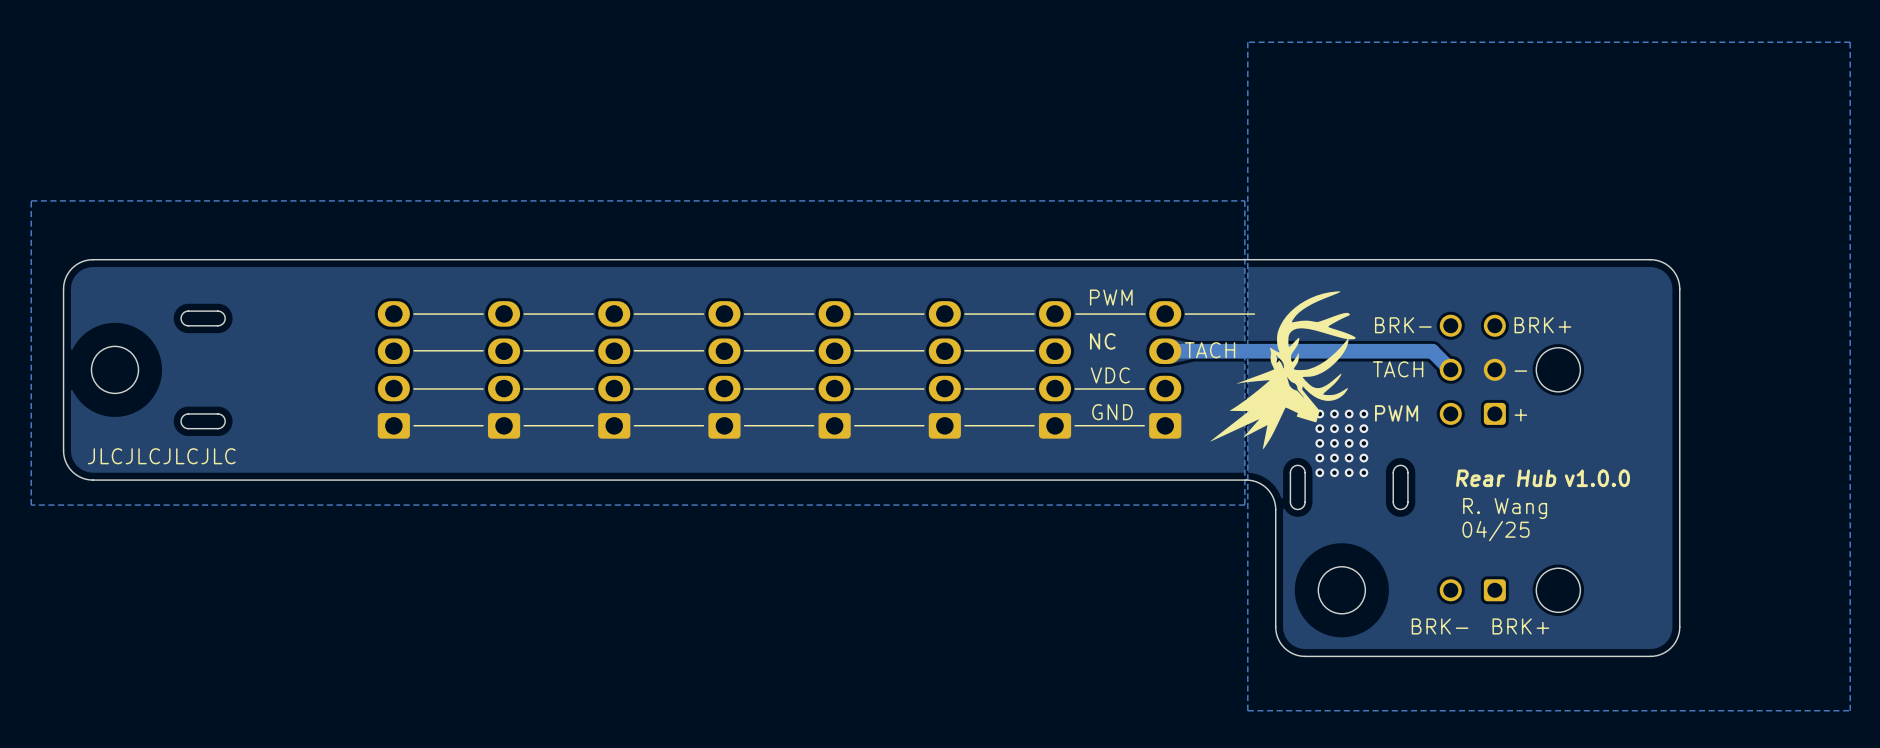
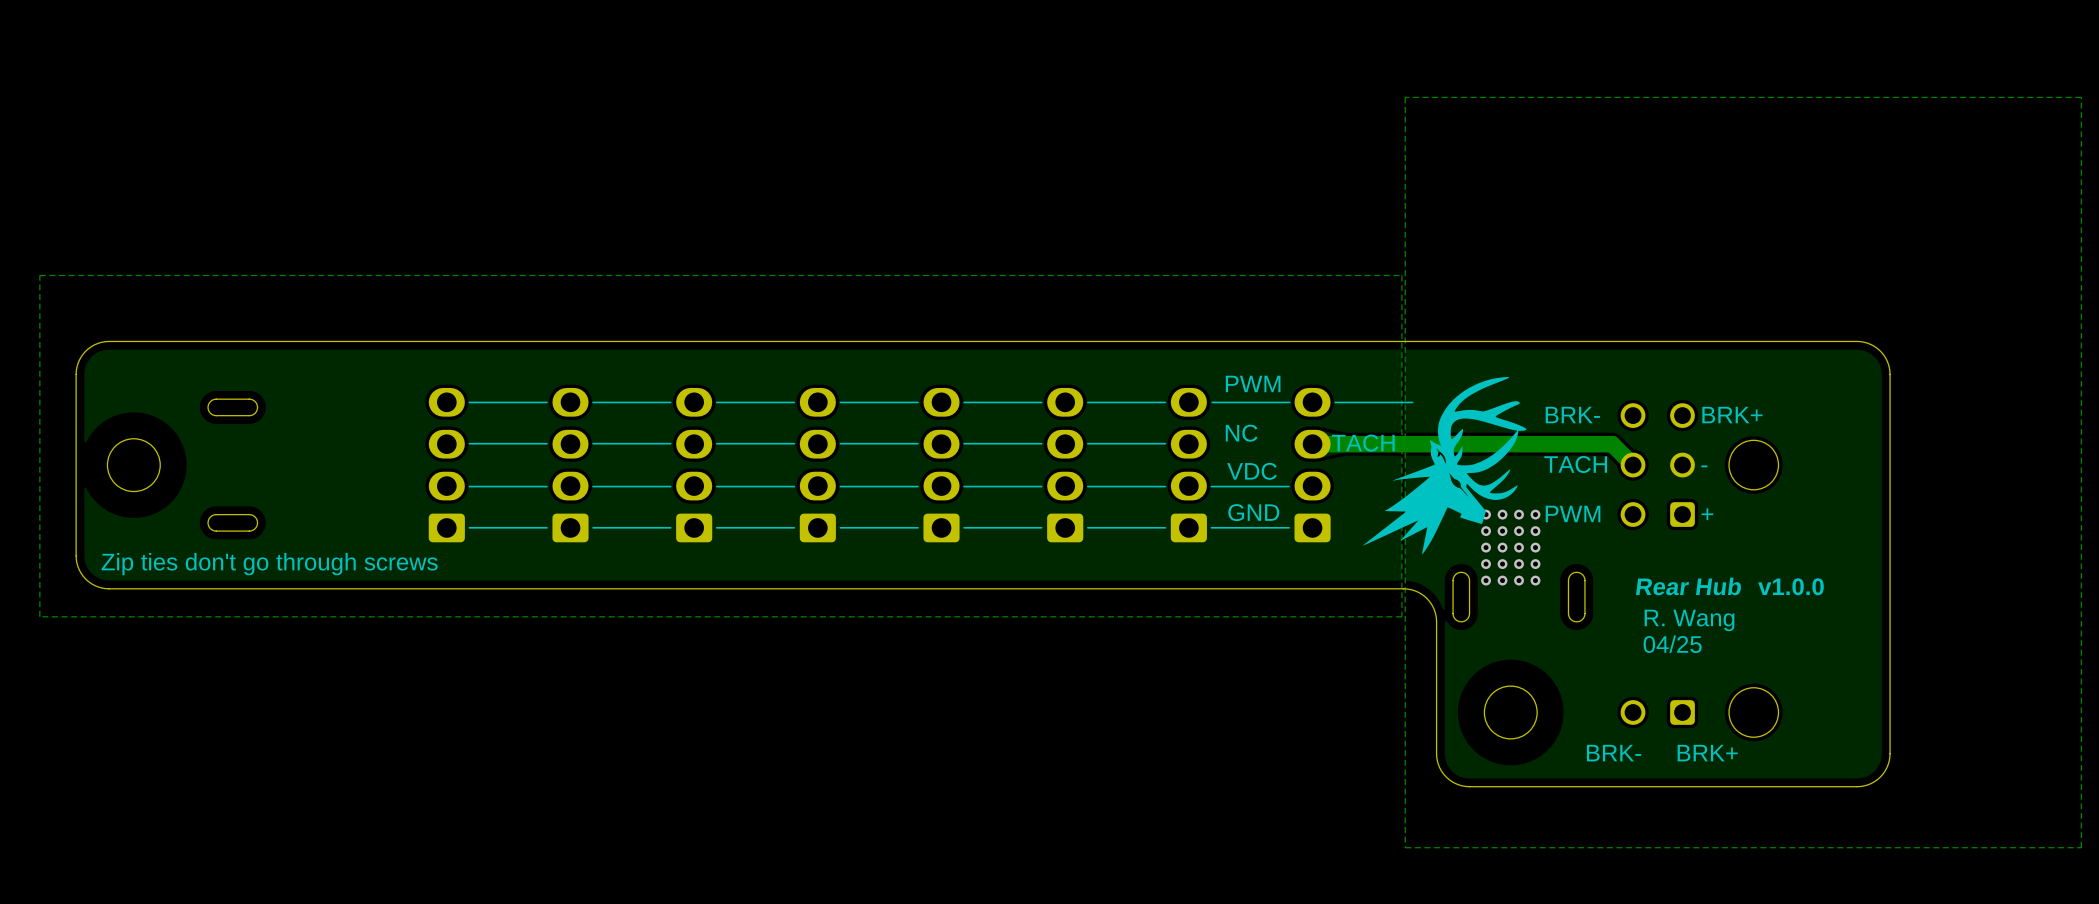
text: JLCJLCJLCJLC (161, 456) -> Zip ties don't go through screws (269, 564)

